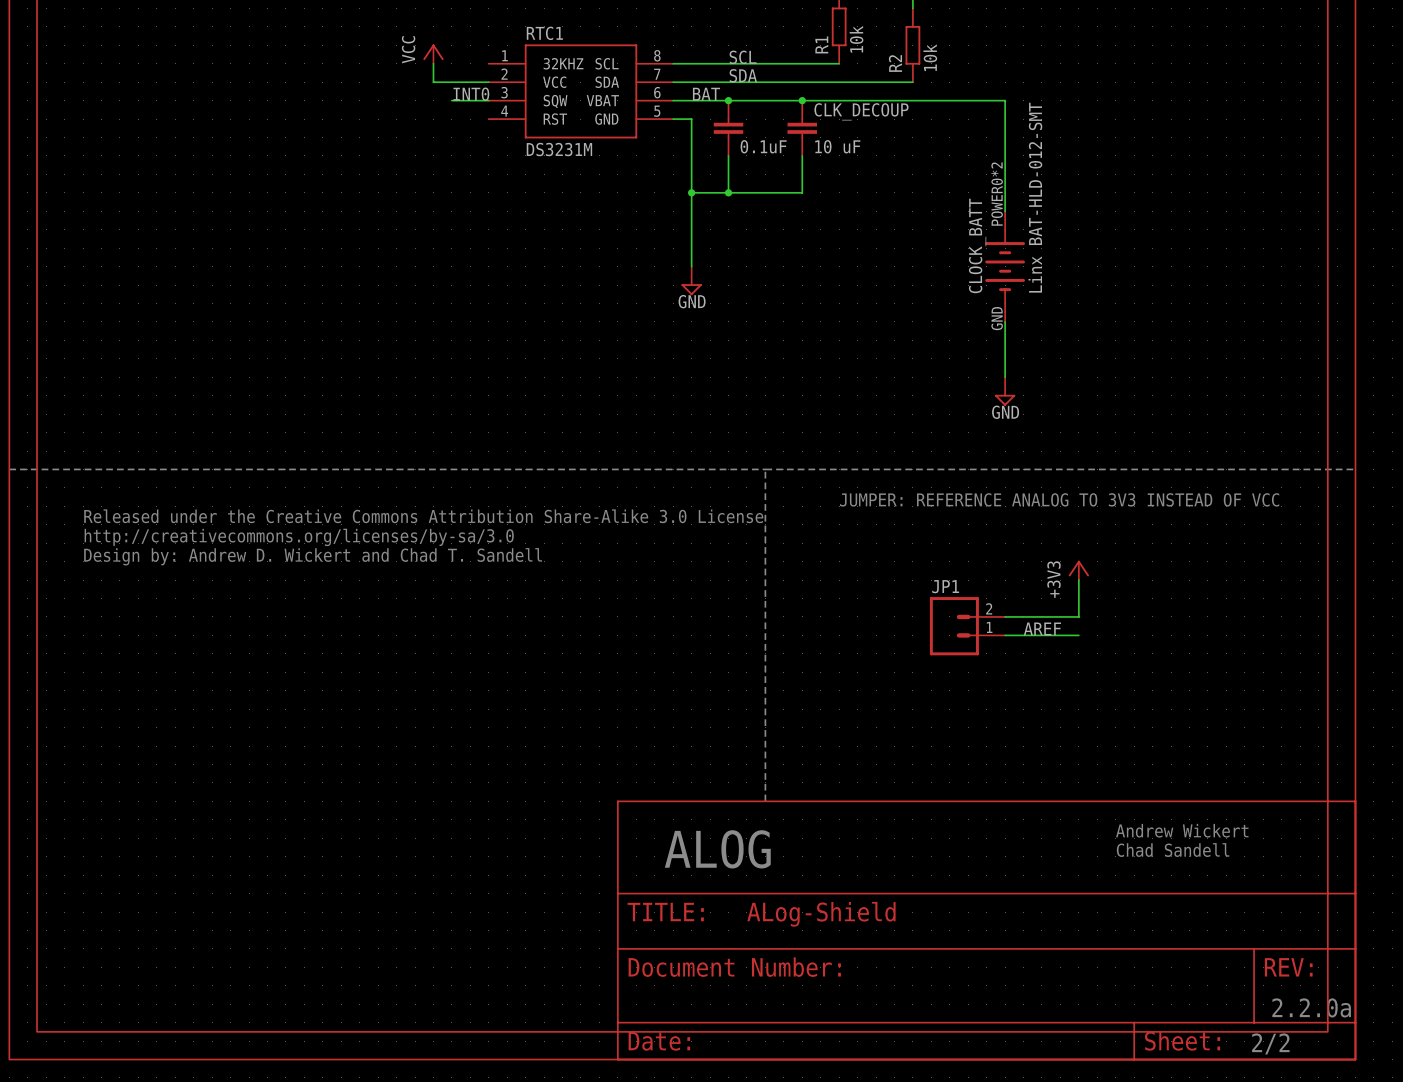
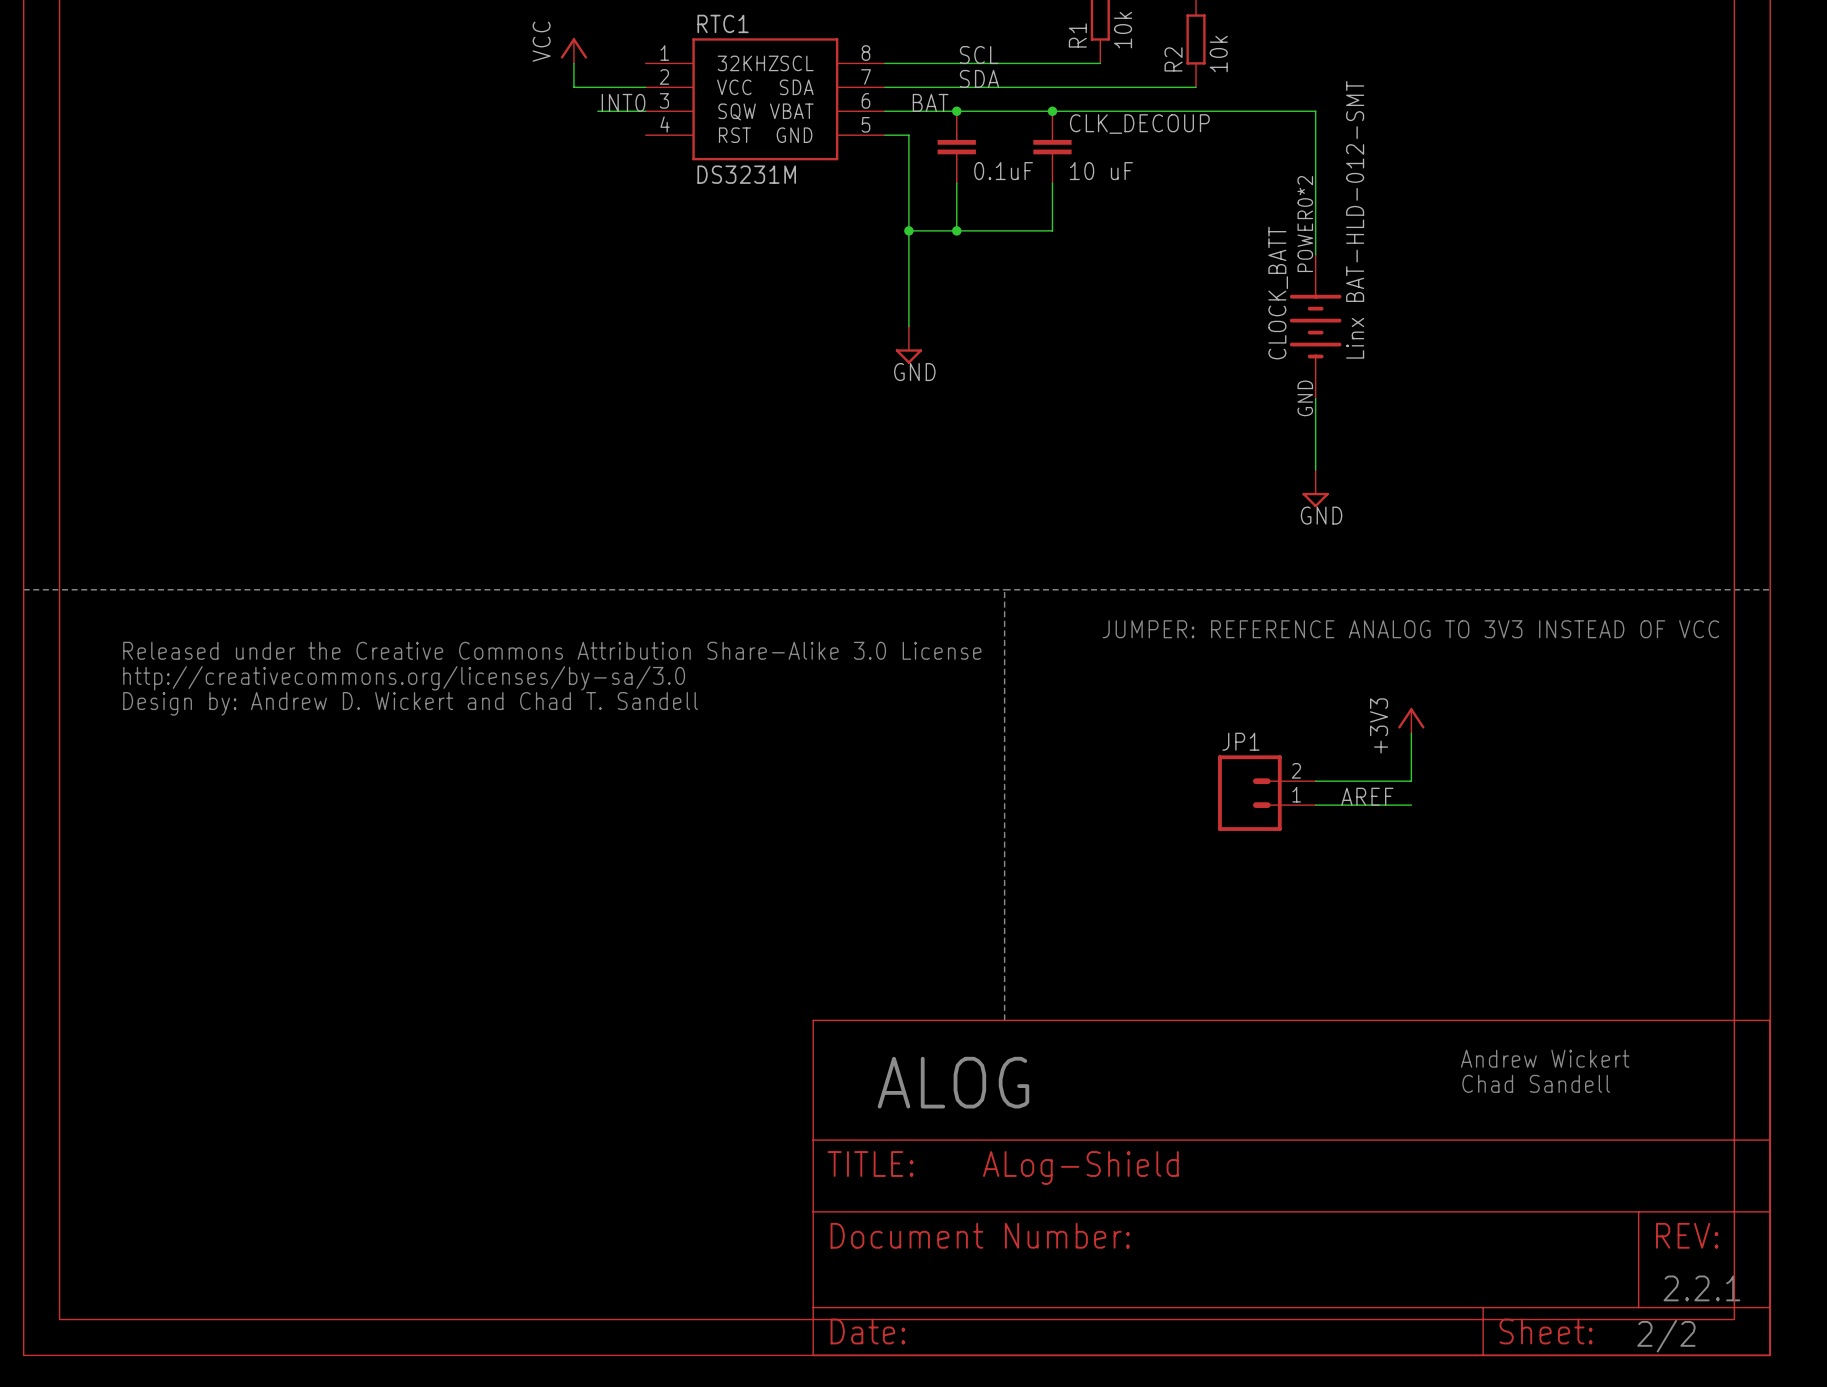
text: 2.2.0a (1311, 1007) -> 2.2.1 (1701, 1288)

